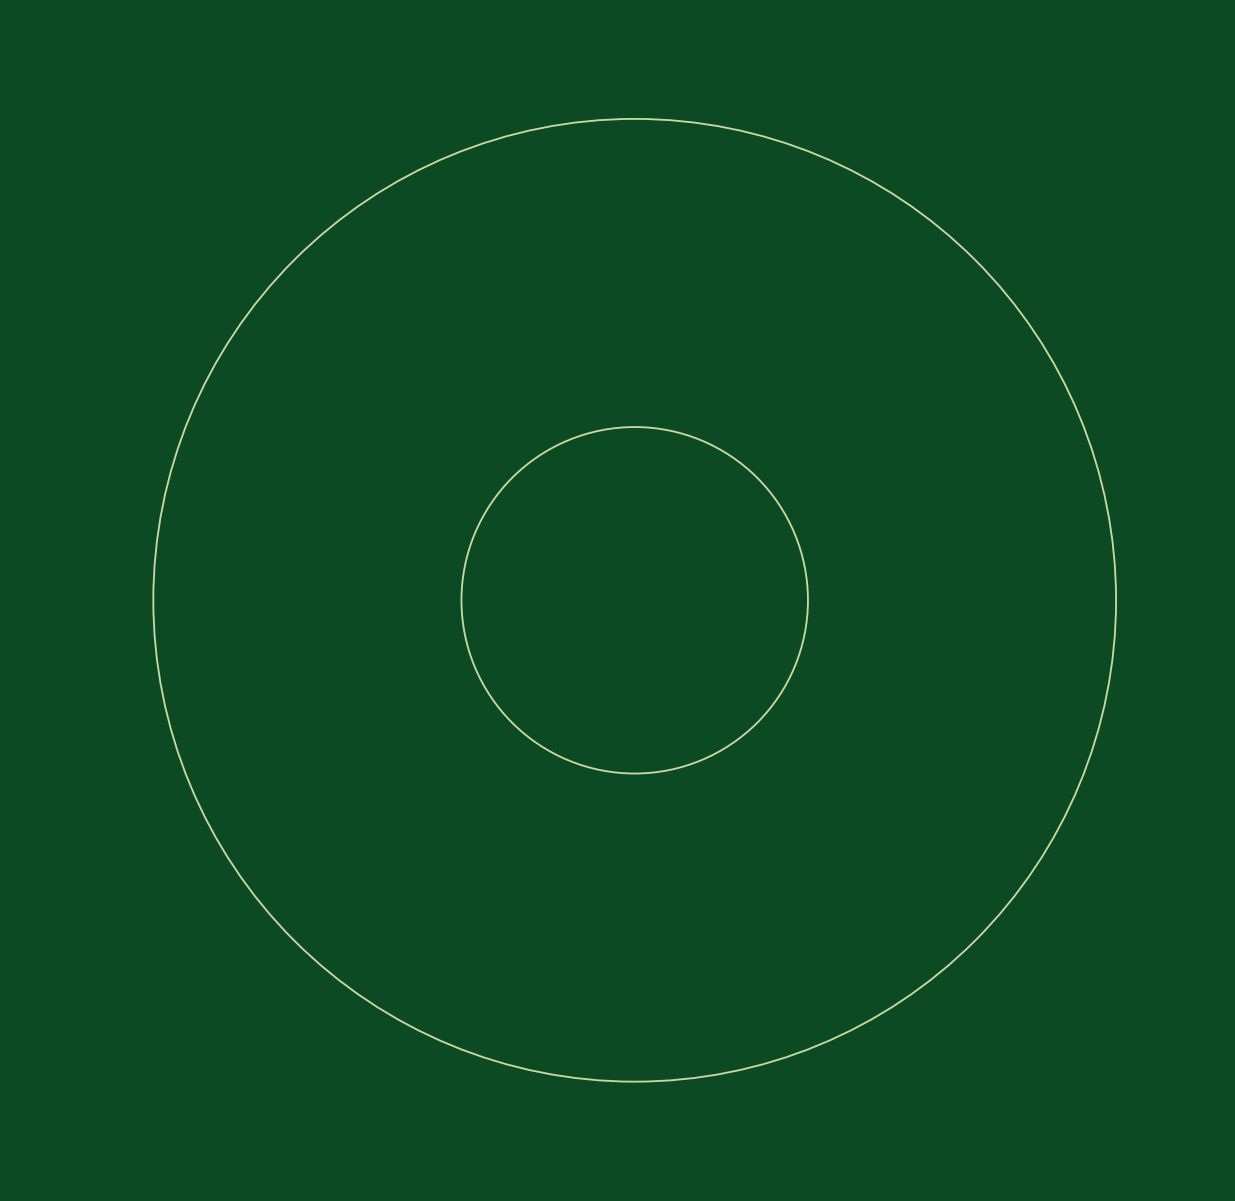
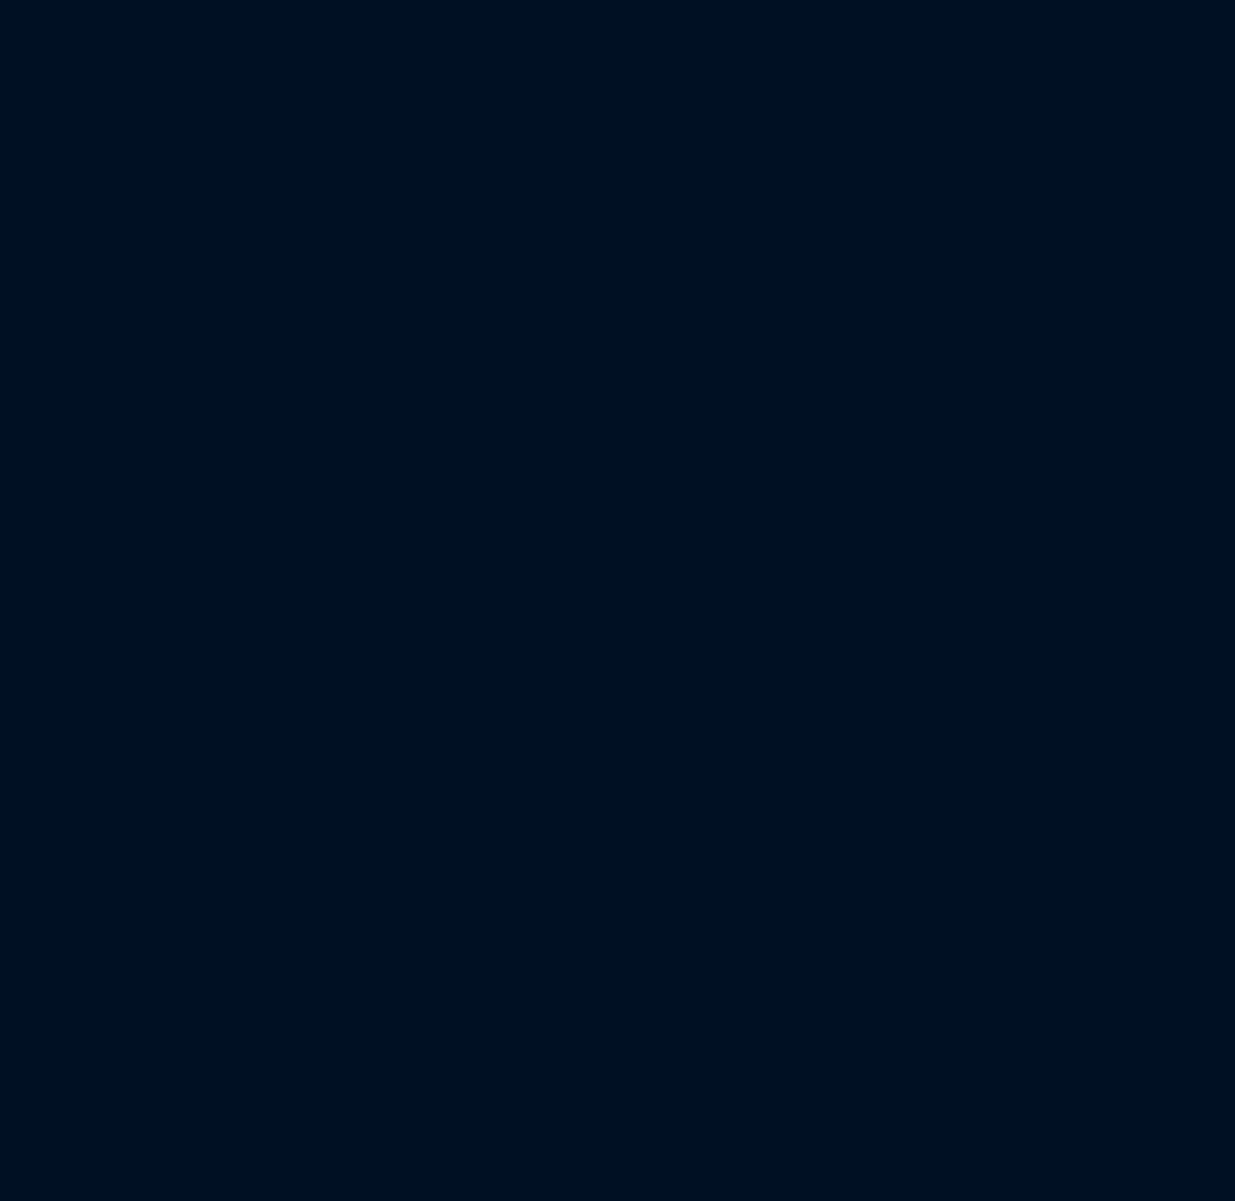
round board edge: [152, 118, 1117, 1083] -> none
round board edge: [460, 426, 809, 775] -> none

